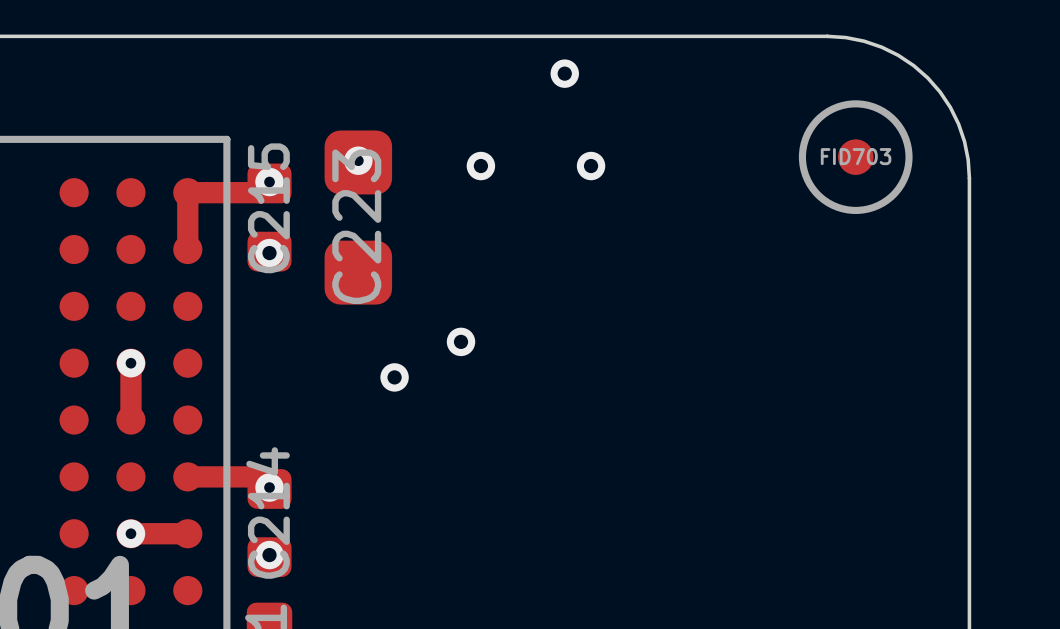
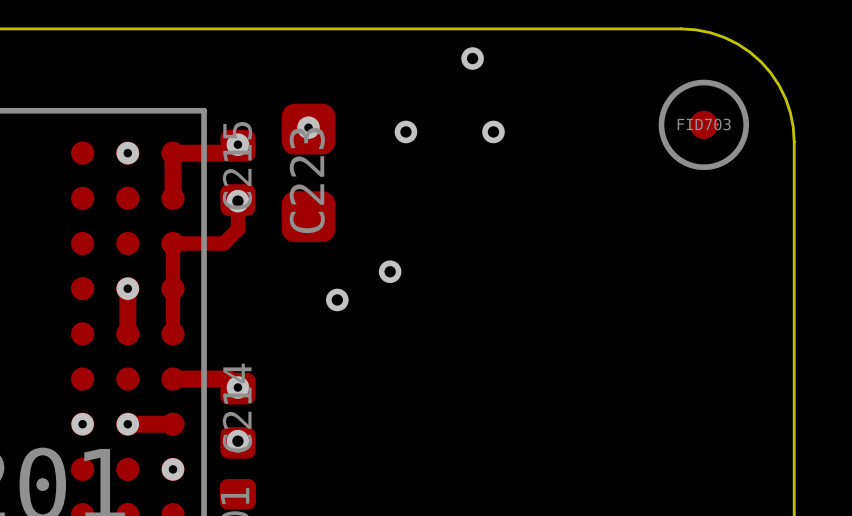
via: none -> (127, 153)
track: none -> (237, 201) (237, 229) (223, 243) (172, 243) (172, 333)
via: none -> (82, 424)
via: none -> (172, 469)

